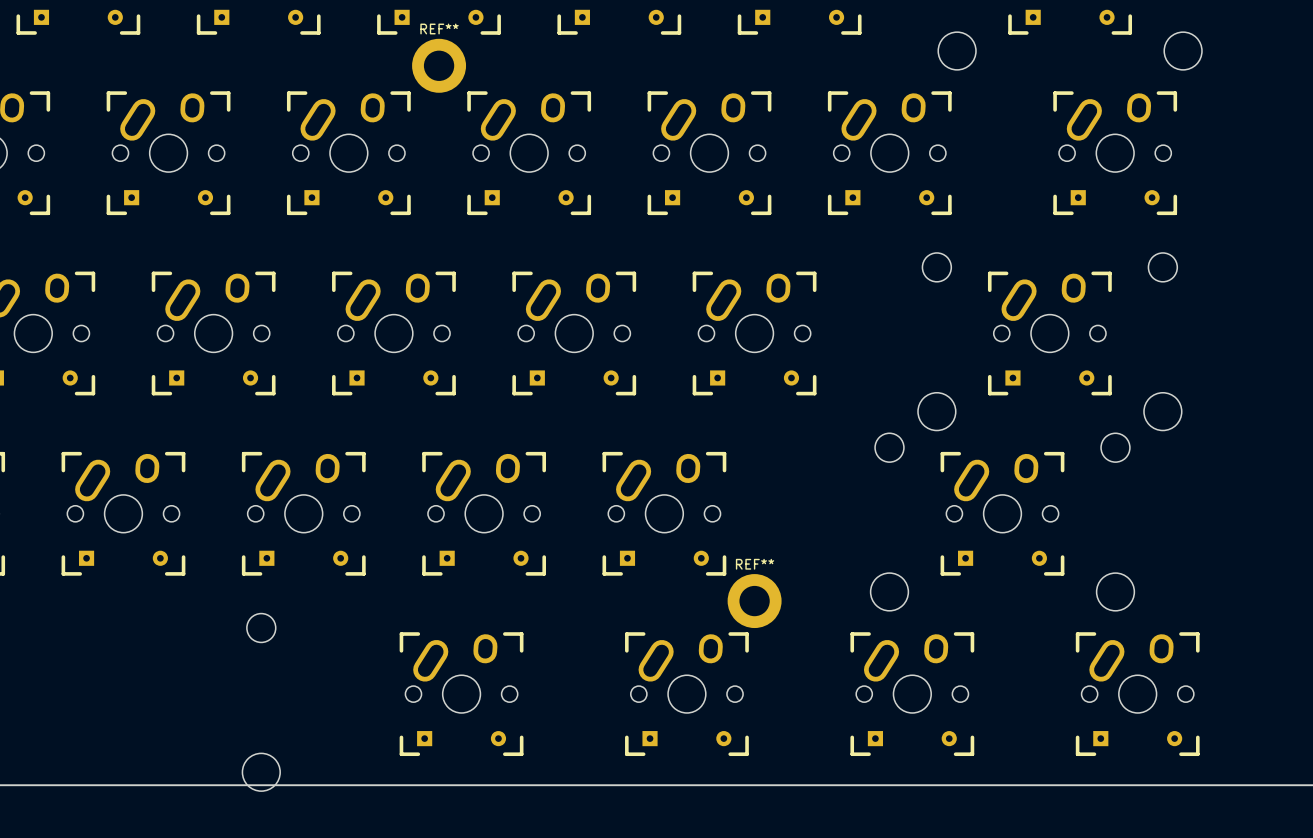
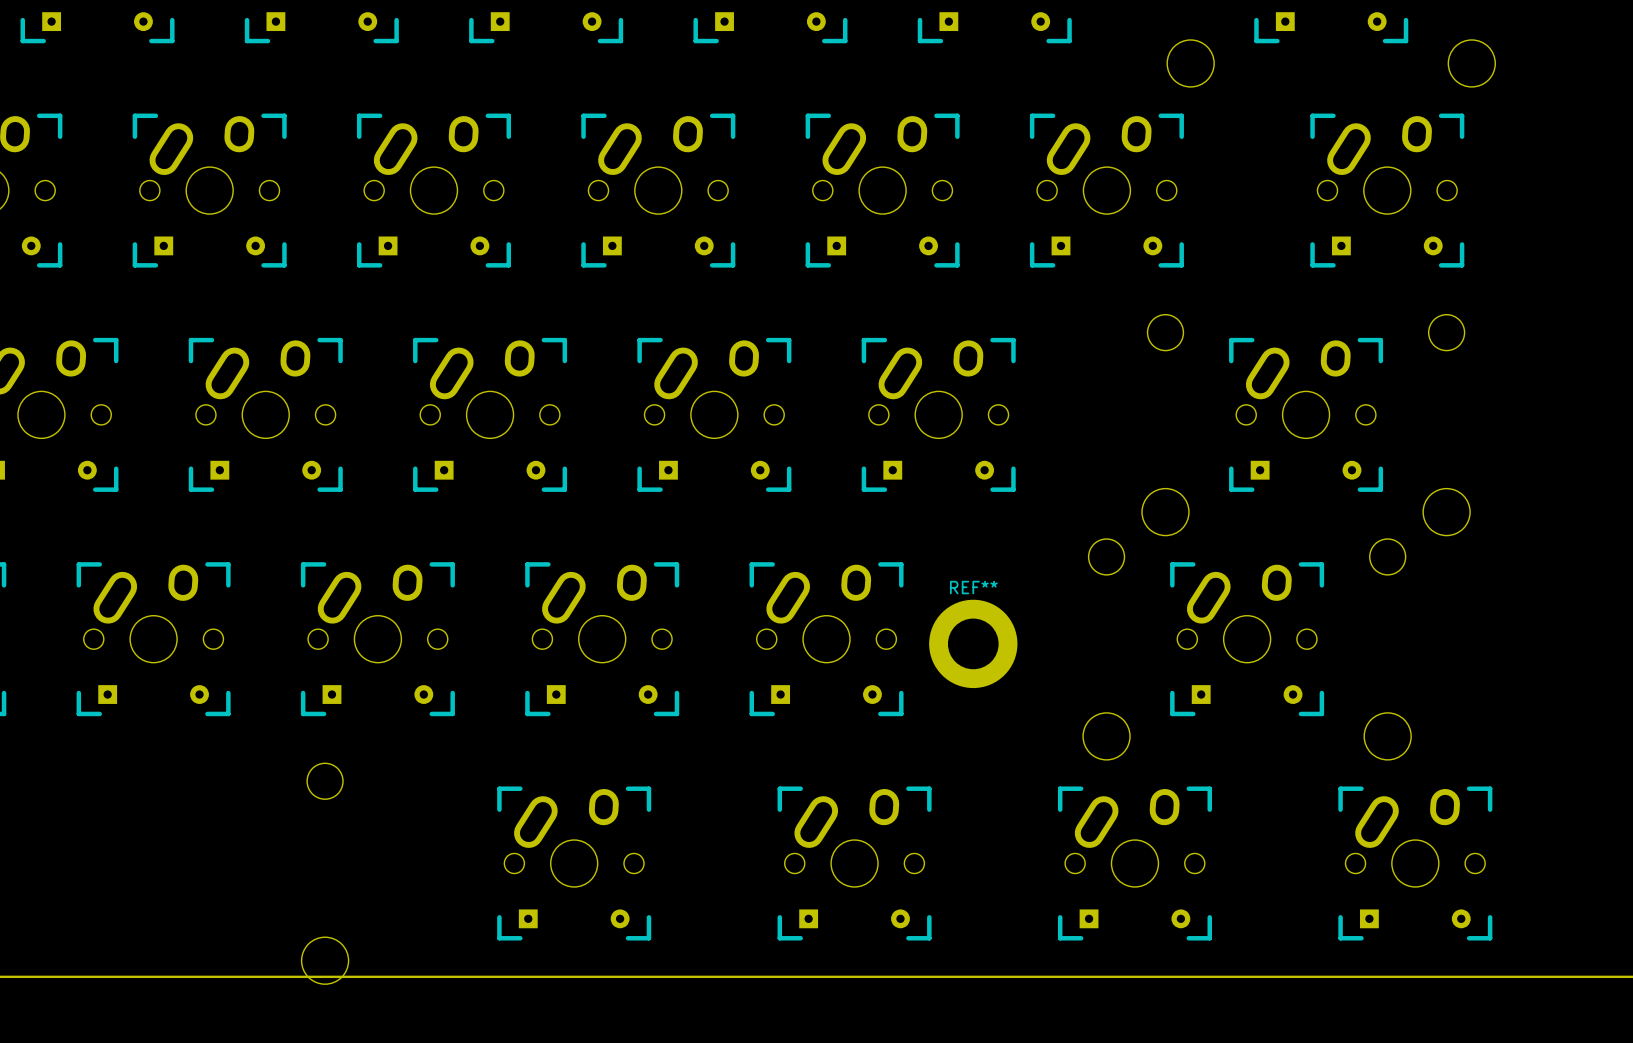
REF**: (439, 65) -> none
REF**: none -> (973, 643)
REF**: (754, 601) -> none

